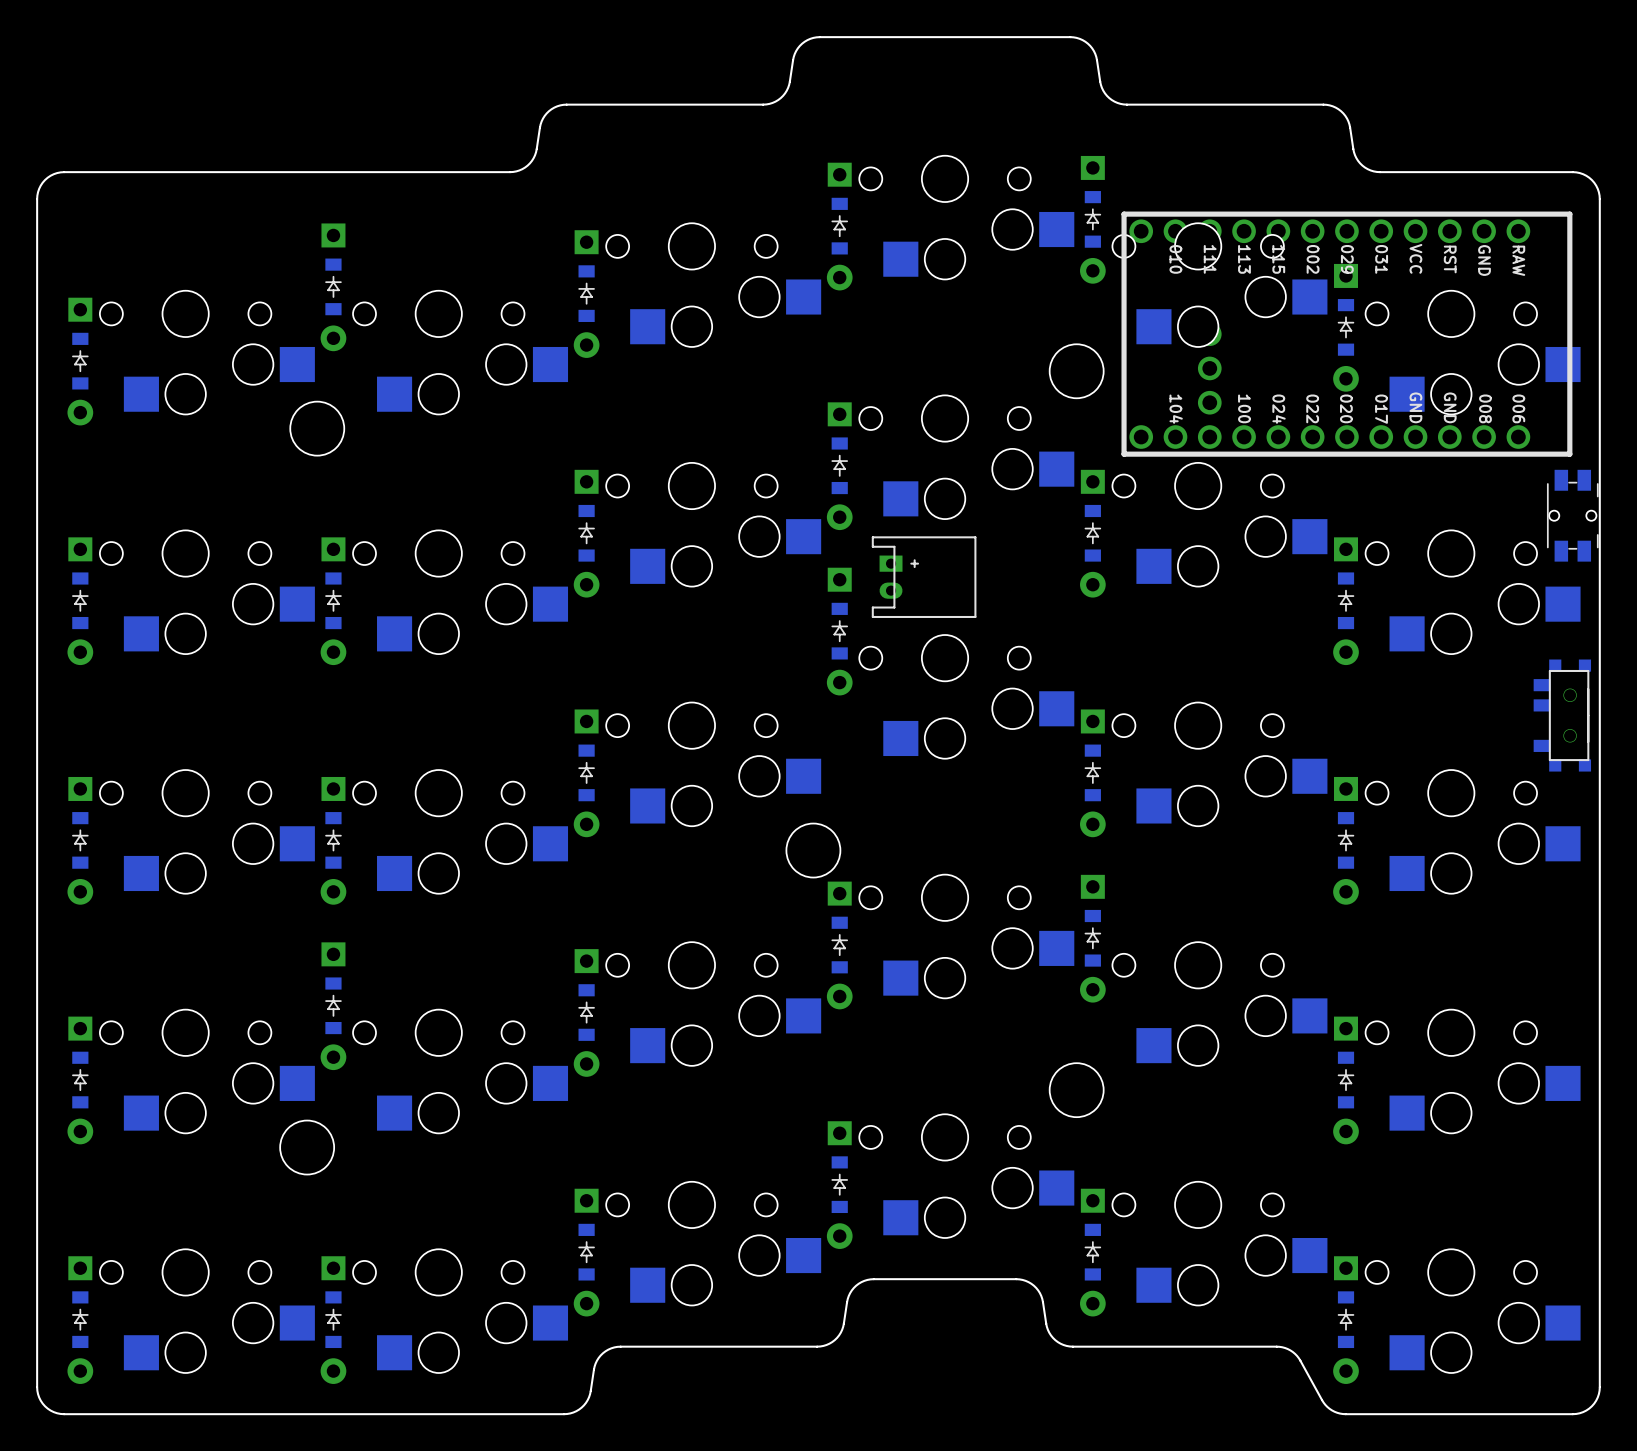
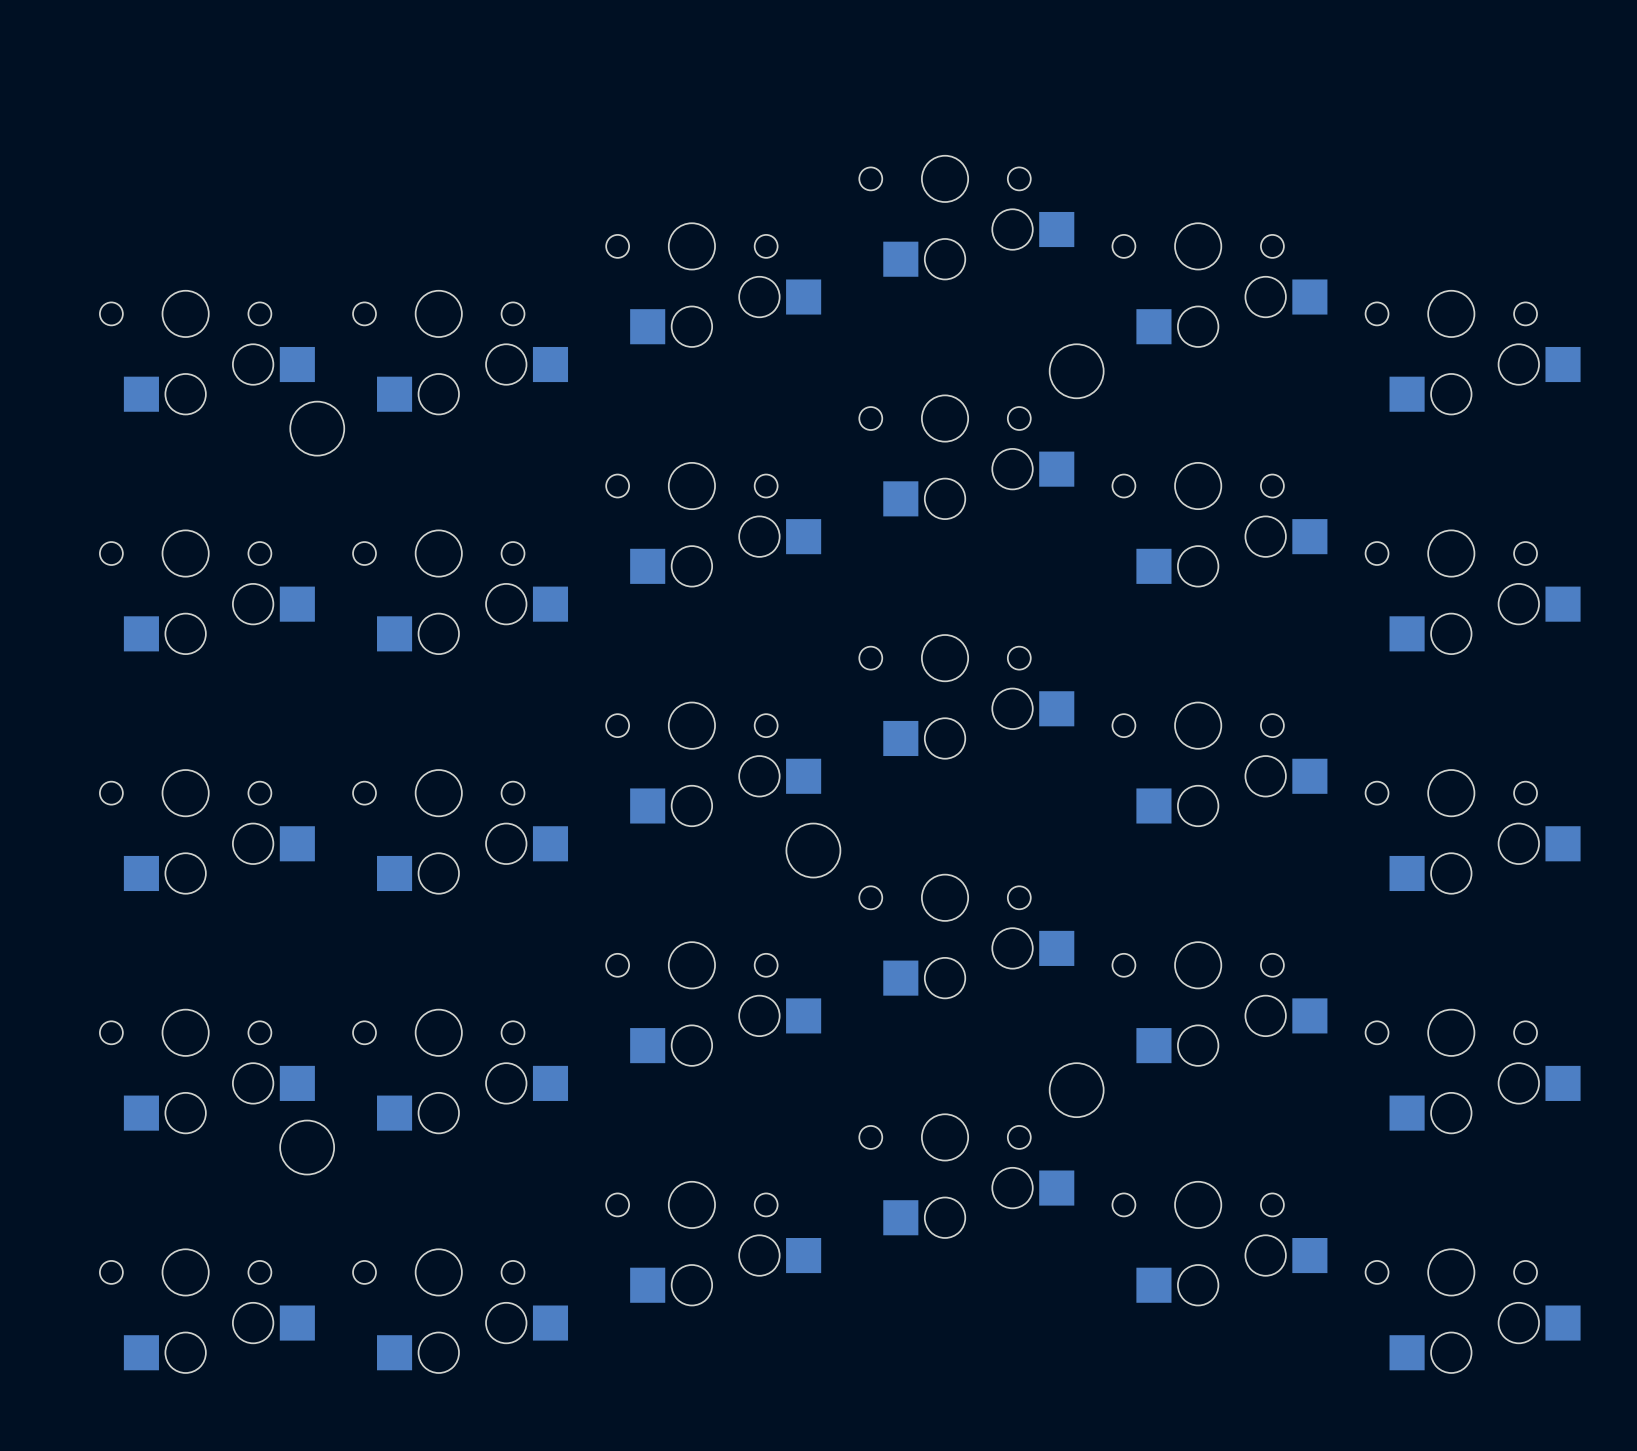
board edge: (1070, 37) (813, 37) (804, 41) (796, 51) (788, 87) (783, 95) (775, 101) (763, 104) (560, 105) (549, 111) (543, 118) (536, 152) (531, 160) (522, 169) (513, 171) (64, 172) (53, 174) (42, 182) (37, 199) (37, 1387) (40, 1400) (47, 1408) (64, 1414) (567, 1413) (576, 1411) (585, 1402) (590, 1394) (595, 1363) (600, 1355) (611, 1348) (620, 1346) (823, 1345) (834, 1340) (840, 1332) (847, 1299) (851, 1290) (861, 1282) (873, 1279) (1016, 1279) (1025, 1280) (1033, 1285) (1041, 1296) (1046, 1326) (1050, 1335) (1057, 1342) (1069, 1346) (1285, 1348) (1298, 1358) (1325, 1404) (1340, 1413) (1572, 1414) (1583, 1412) (1594, 1403) (1599, 1387) (1599, 199) (1597, 188) (1589, 177) (1576, 172) (1380, 172) (1370, 170) (1360, 163) (1355, 155) (1349, 124) (1345, 115) (1338, 109) (1326, 104) (1120, 103) (1111, 100) (1103, 90) (1096, 57) (1092, 48) (1082, 40) (1070, 37) -> none
part: (1092, 219) -> none
part: (839, 226) -> none
part: (333, 287) -> none
part: (586, 294) -> none
part: (1346, 327) -> none
part: (1346, 334) -> none
part: (80, 361) -> none
part: (839, 466) -> none
part: (1572, 515) -> none
part: (586, 533) -> none
part: (1092, 533) -> none
part: (924, 577) -> none
part: (80, 601) -> none
part: (333, 601) -> none
part: (1346, 601) -> none
part: (839, 631) -> none
part: (1562, 715) -> none
part: (586, 773) -> none
part: (1092, 773) -> none
part: (80, 840) -> none
part: (333, 840) -> none
part: (1346, 840) -> none
part: (1092, 938) -> none
part: (839, 945) -> none
part: (333, 1006) -> none
part: (586, 1012) -> none
part: (80, 1080) -> none
part: (1346, 1080) -> none
part: (839, 1185) -> none
part: (586, 1252) -> none
part: (1092, 1252) -> none
part: (80, 1320) -> none
part: (333, 1320) -> none
part: (1346, 1320) -> none

